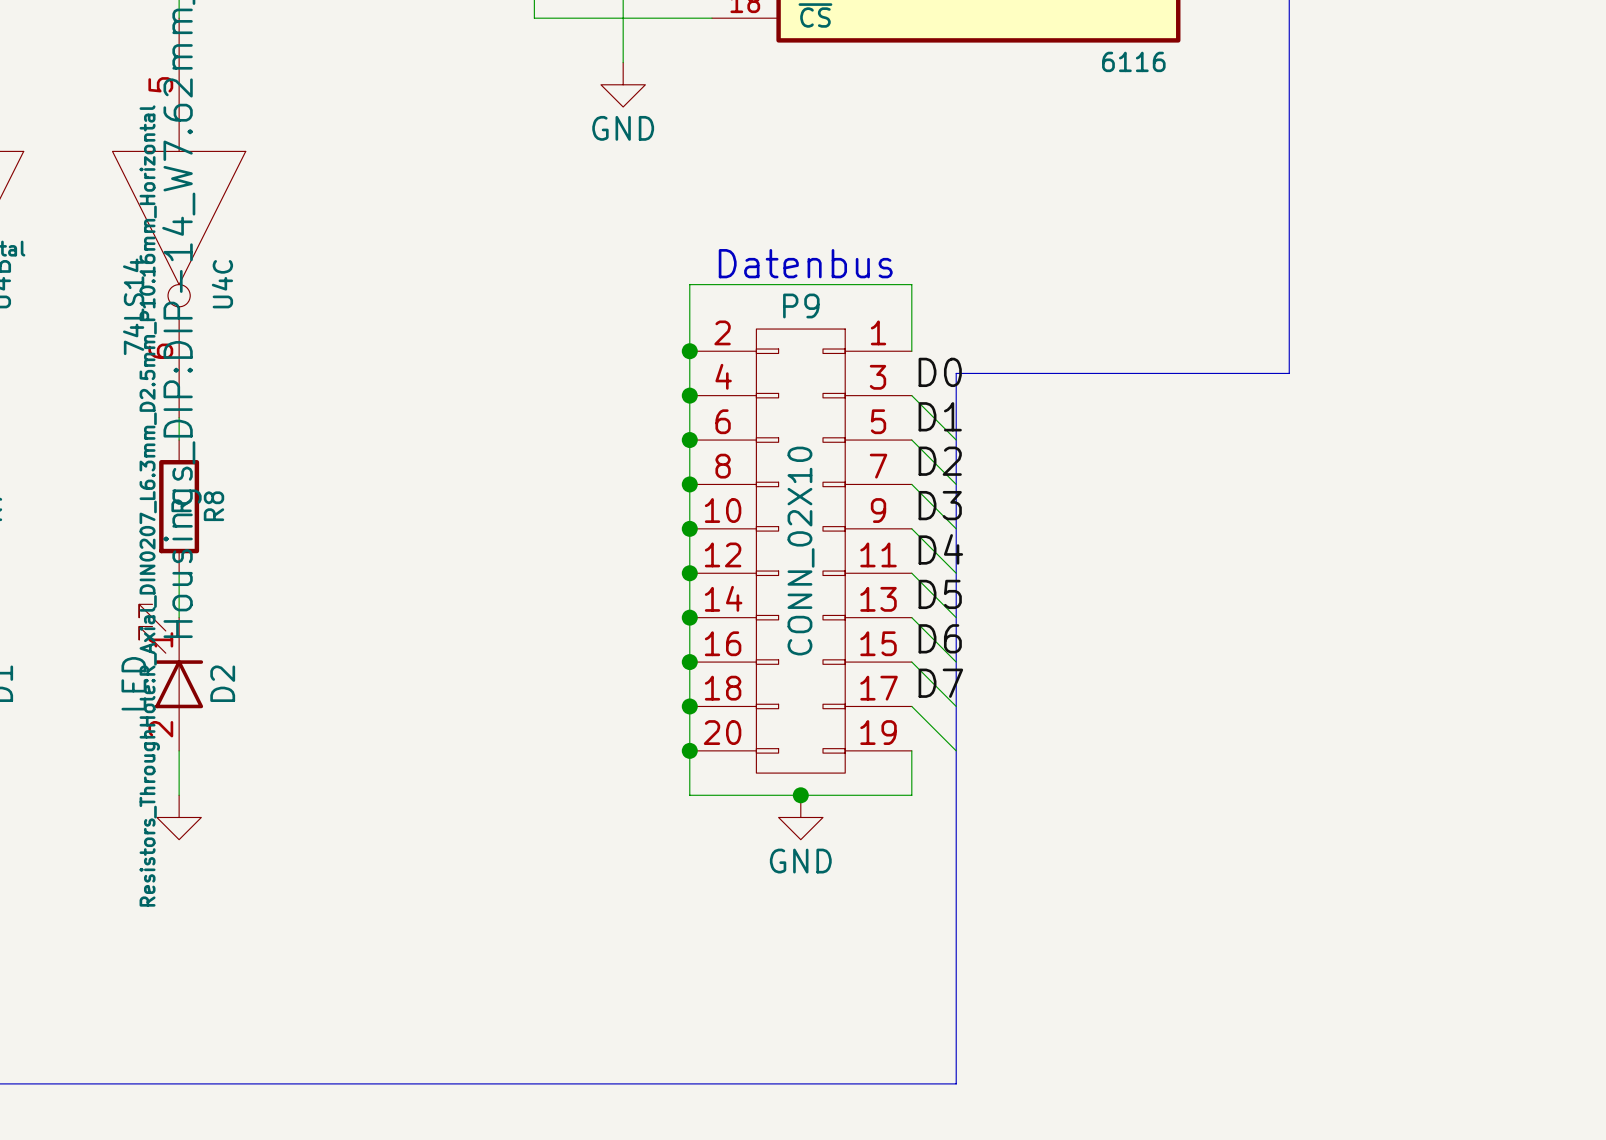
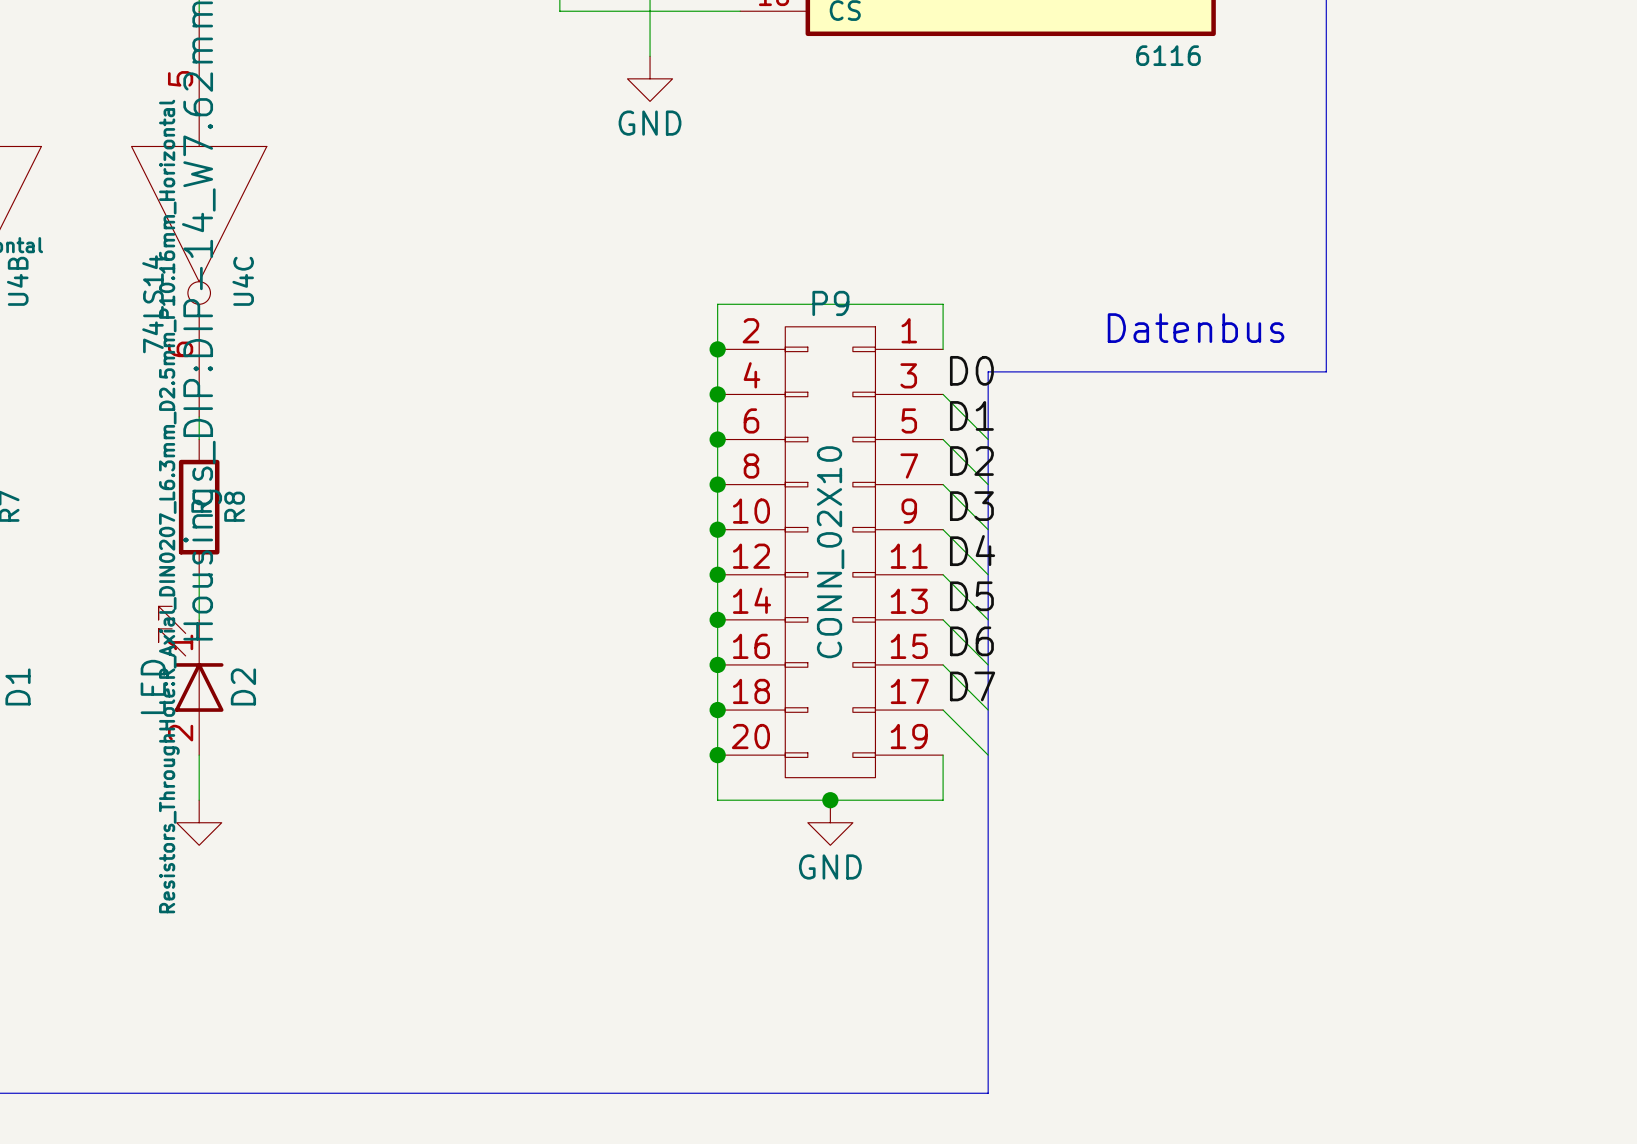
text position: Datenbus (805, 263) -> Datenbus (1196, 328)
wire: (689, 306) (689, 284) (911, 284) (911, 306) -> (717, 304) (943, 304)

